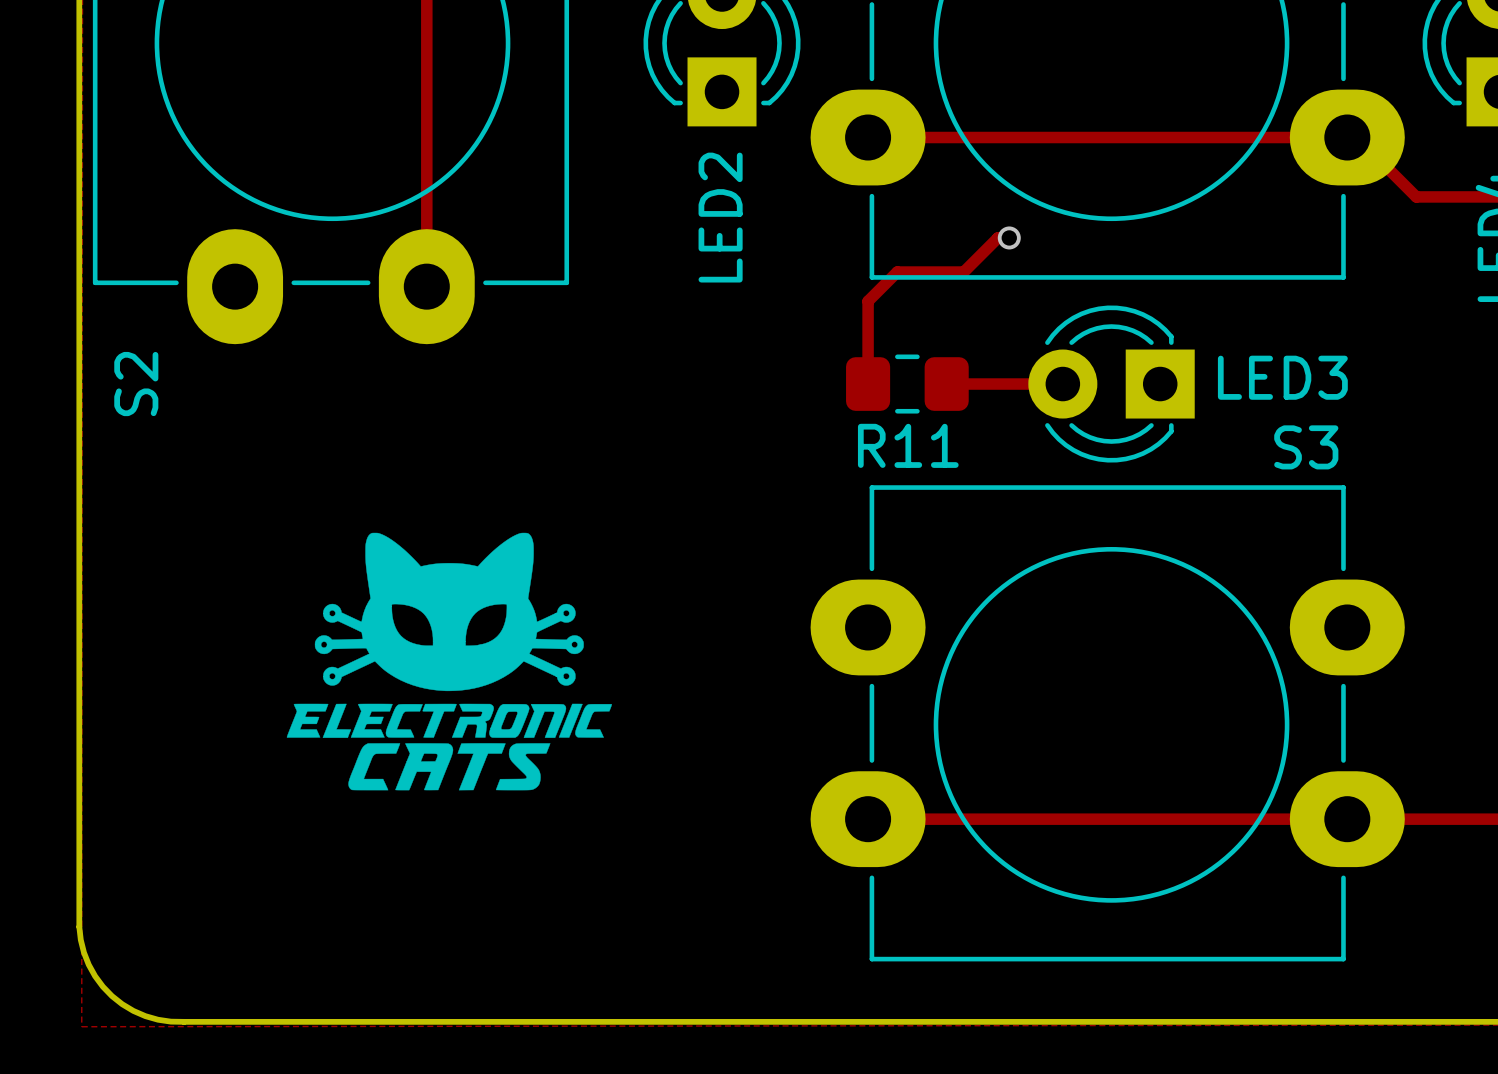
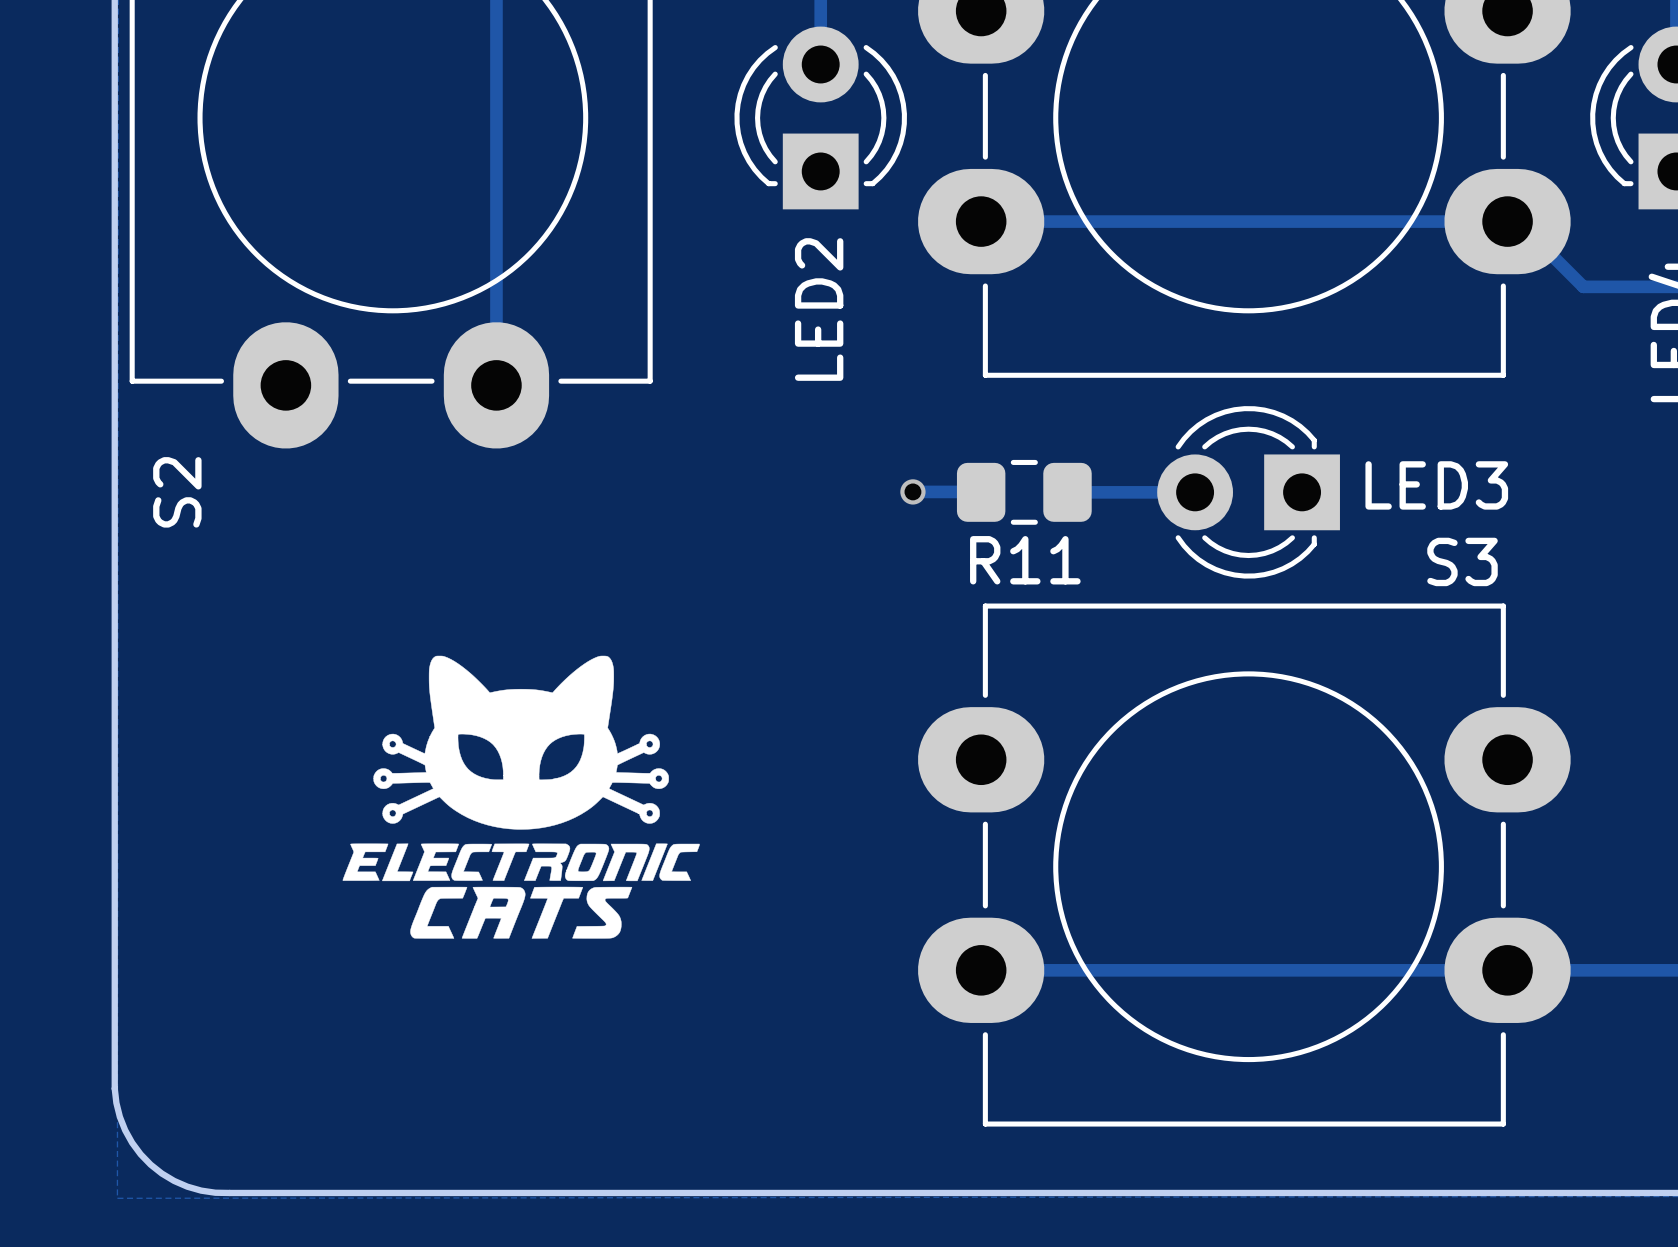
via: (1009, 237) -> none
track: (1014, 237) (997, 237) (963, 272) (897, 272) (868, 301) (868, 384) -> (912, 491) (980, 491)
via: none -> (912, 491)

